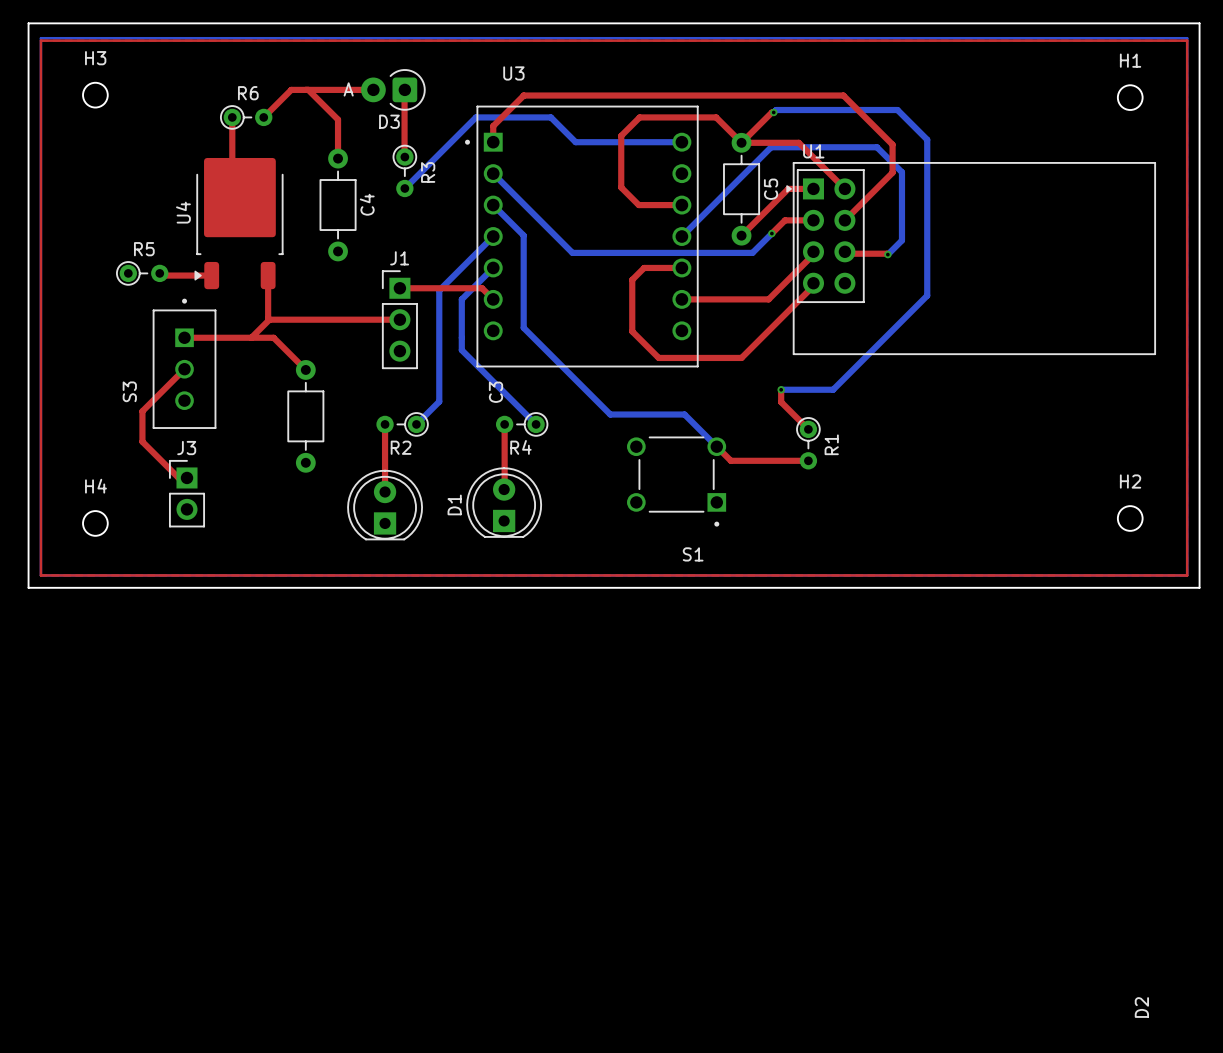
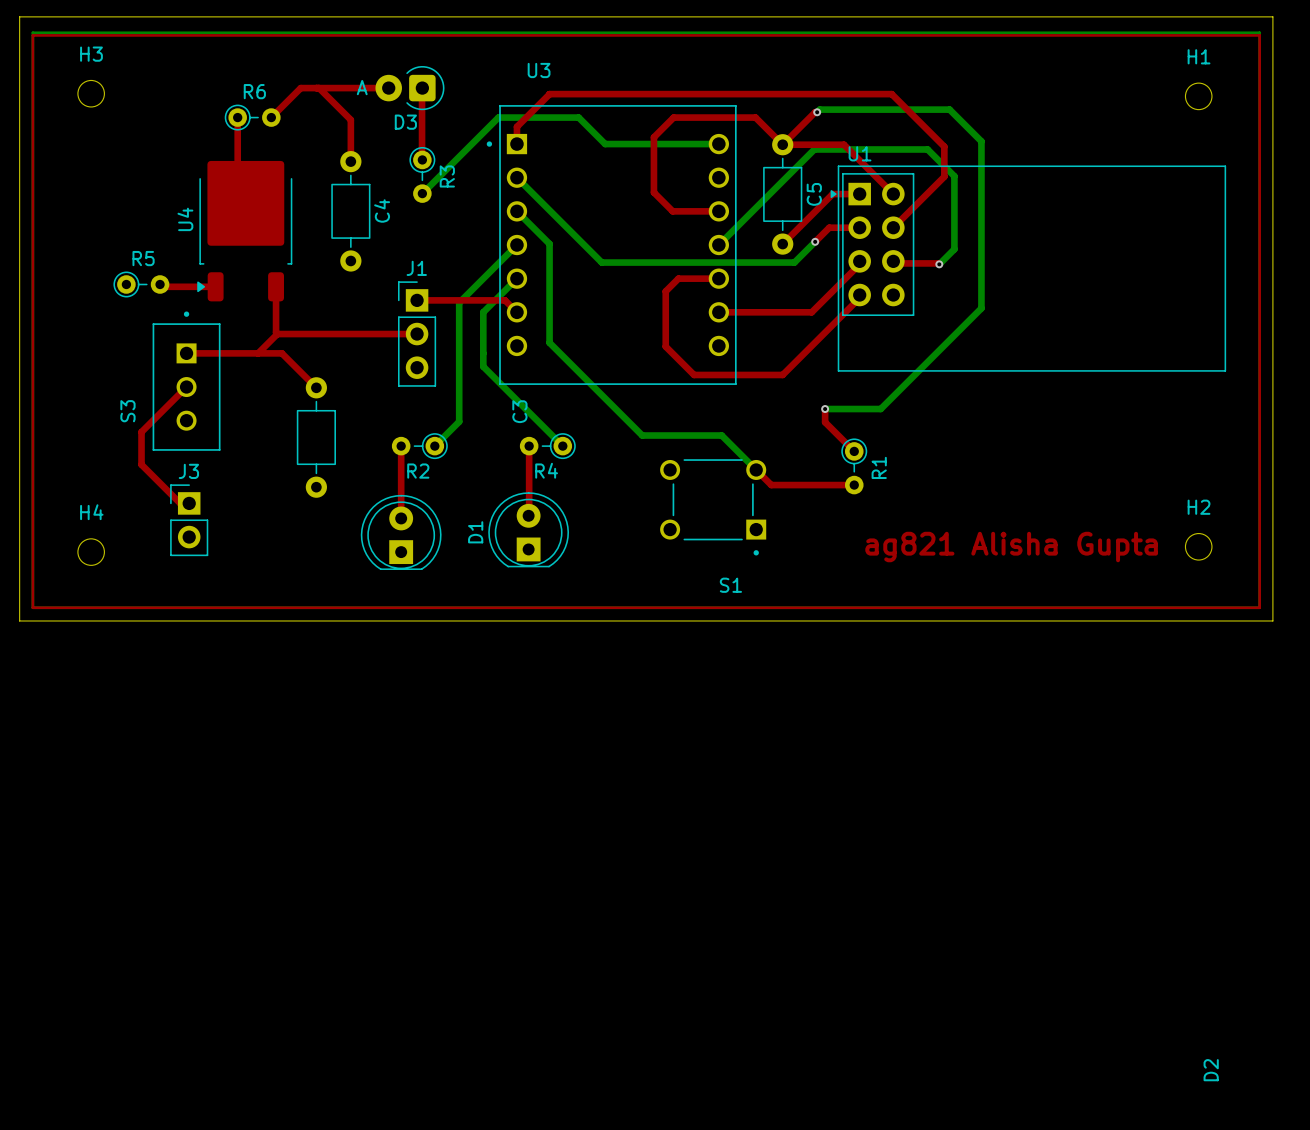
text: none -> ag821 Alisha Gupta (1011, 547)

